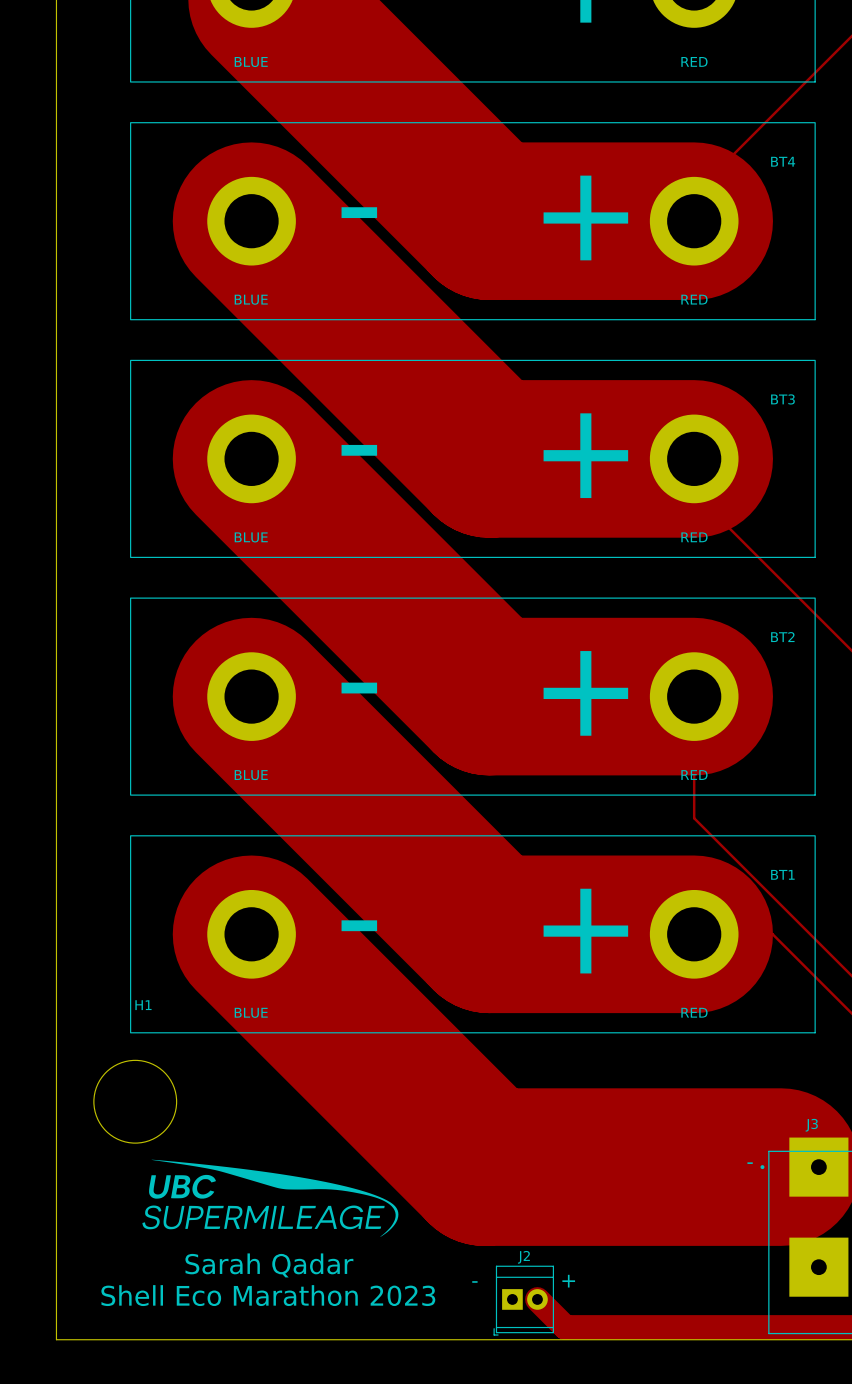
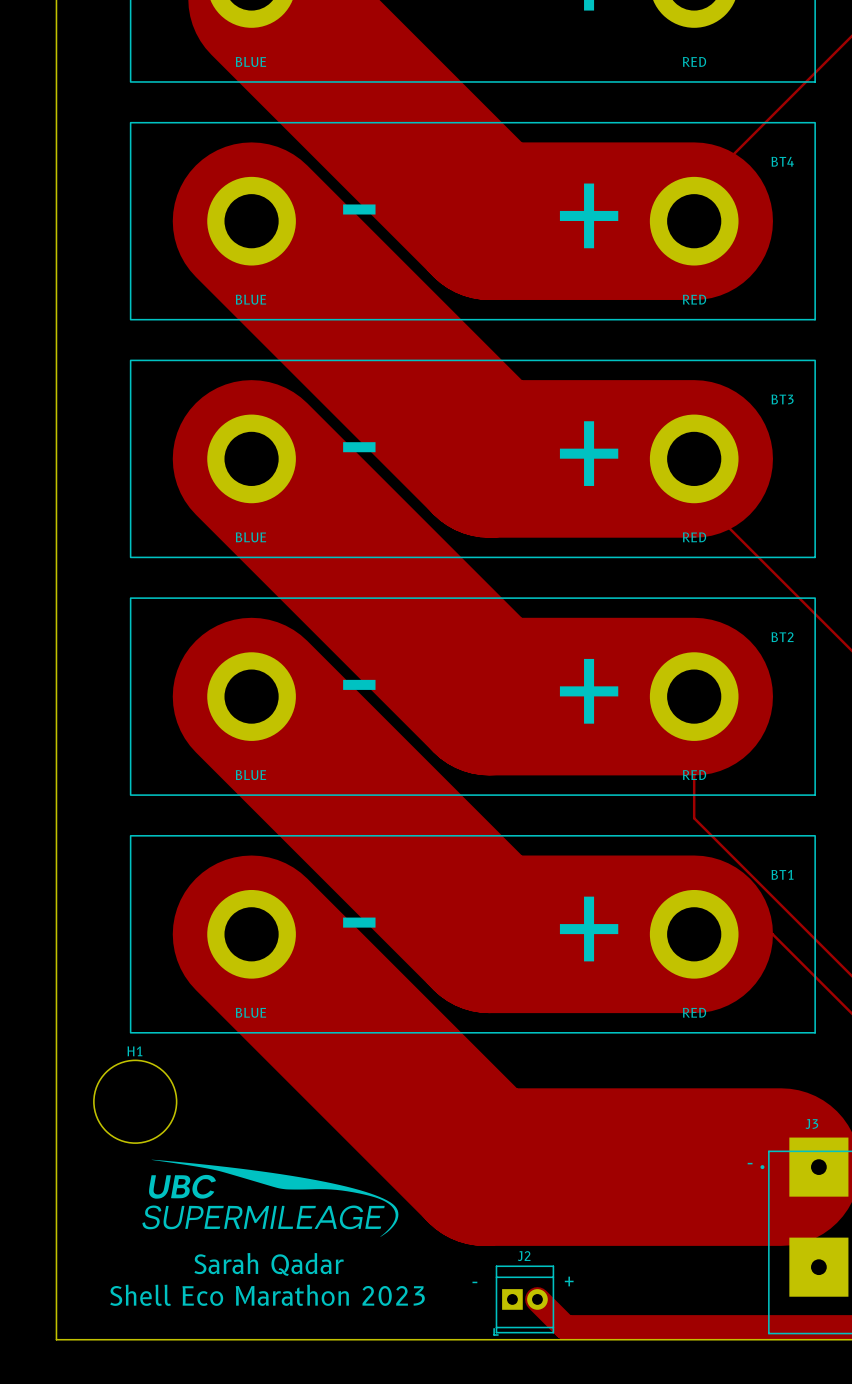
H1 name position: H1 (143, 1005) -> H1 (134, 1051)

